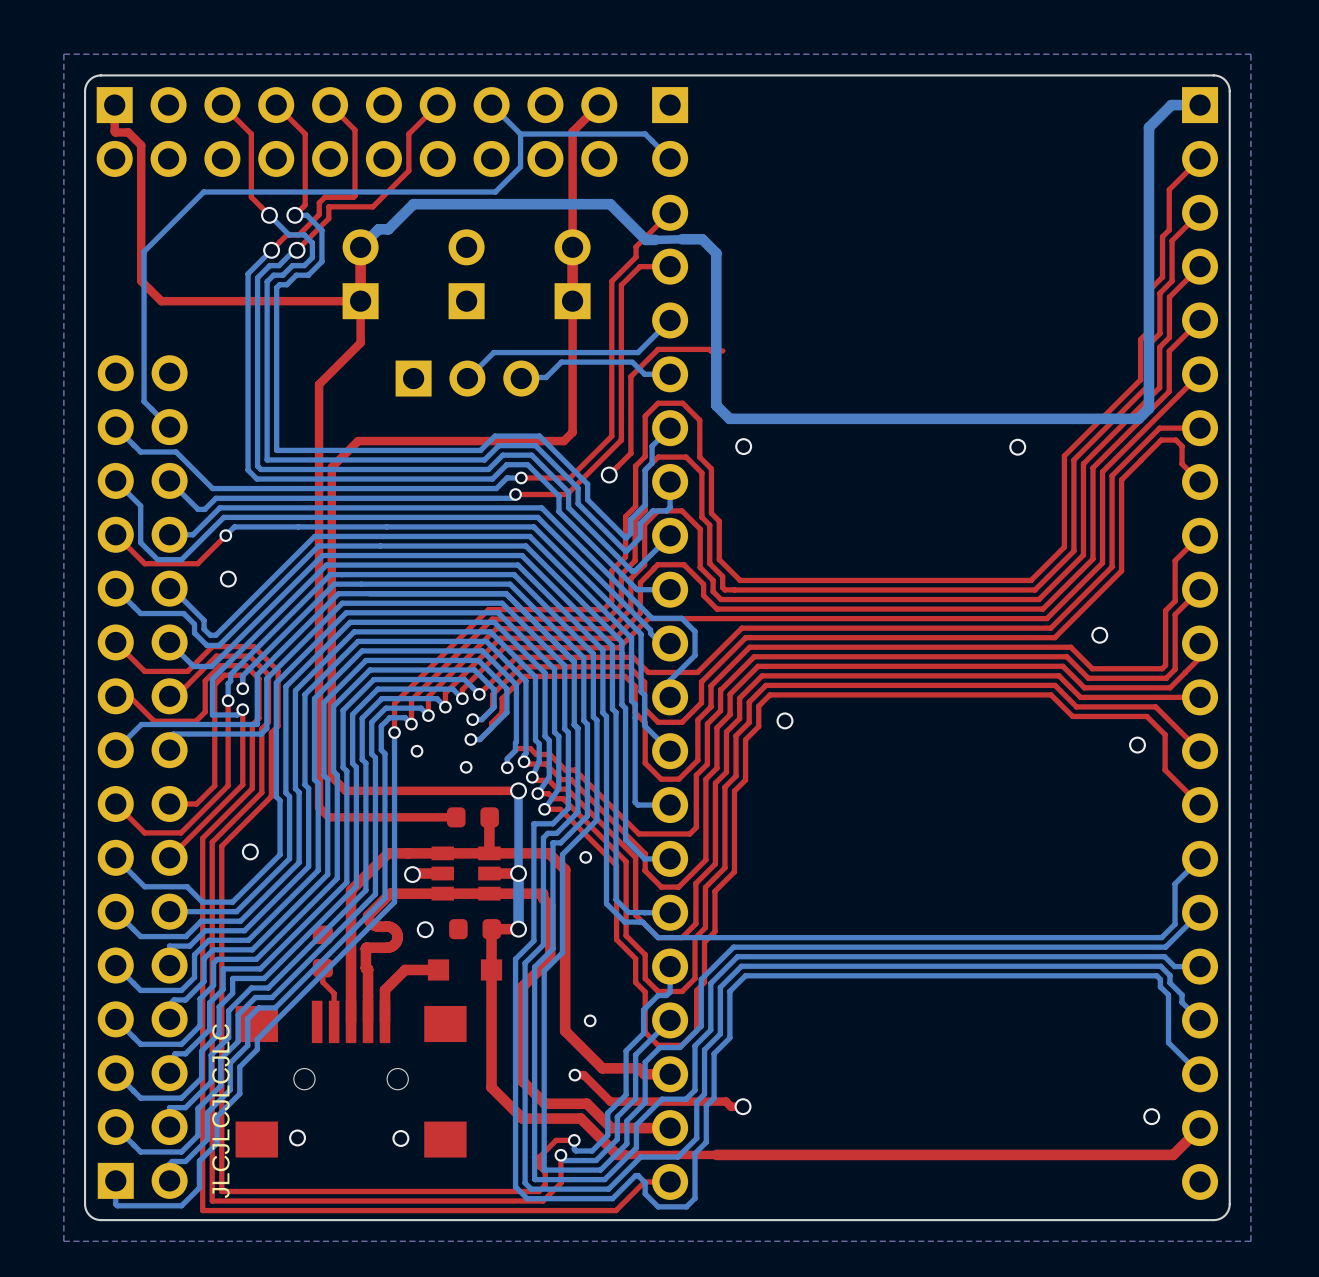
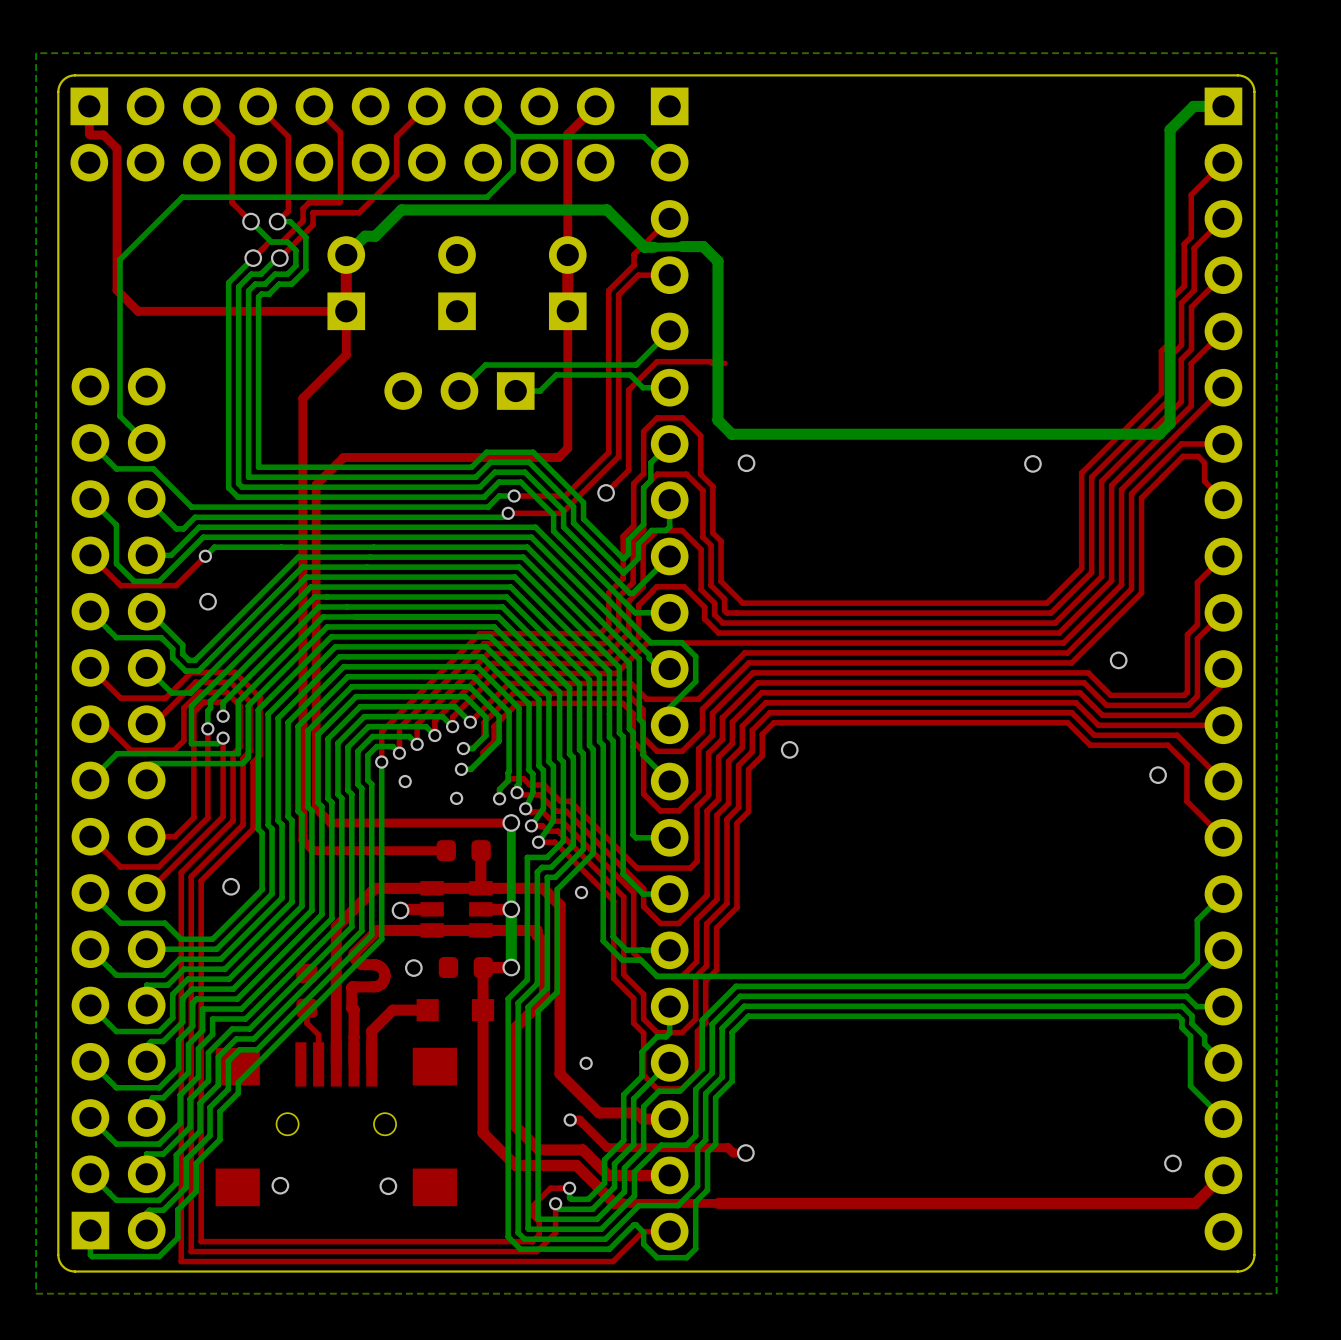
part rotation: 0° (467, 378) -> 180° (459, 391)
text: JLCJLCJLCJLC (220, 1111) -> none

